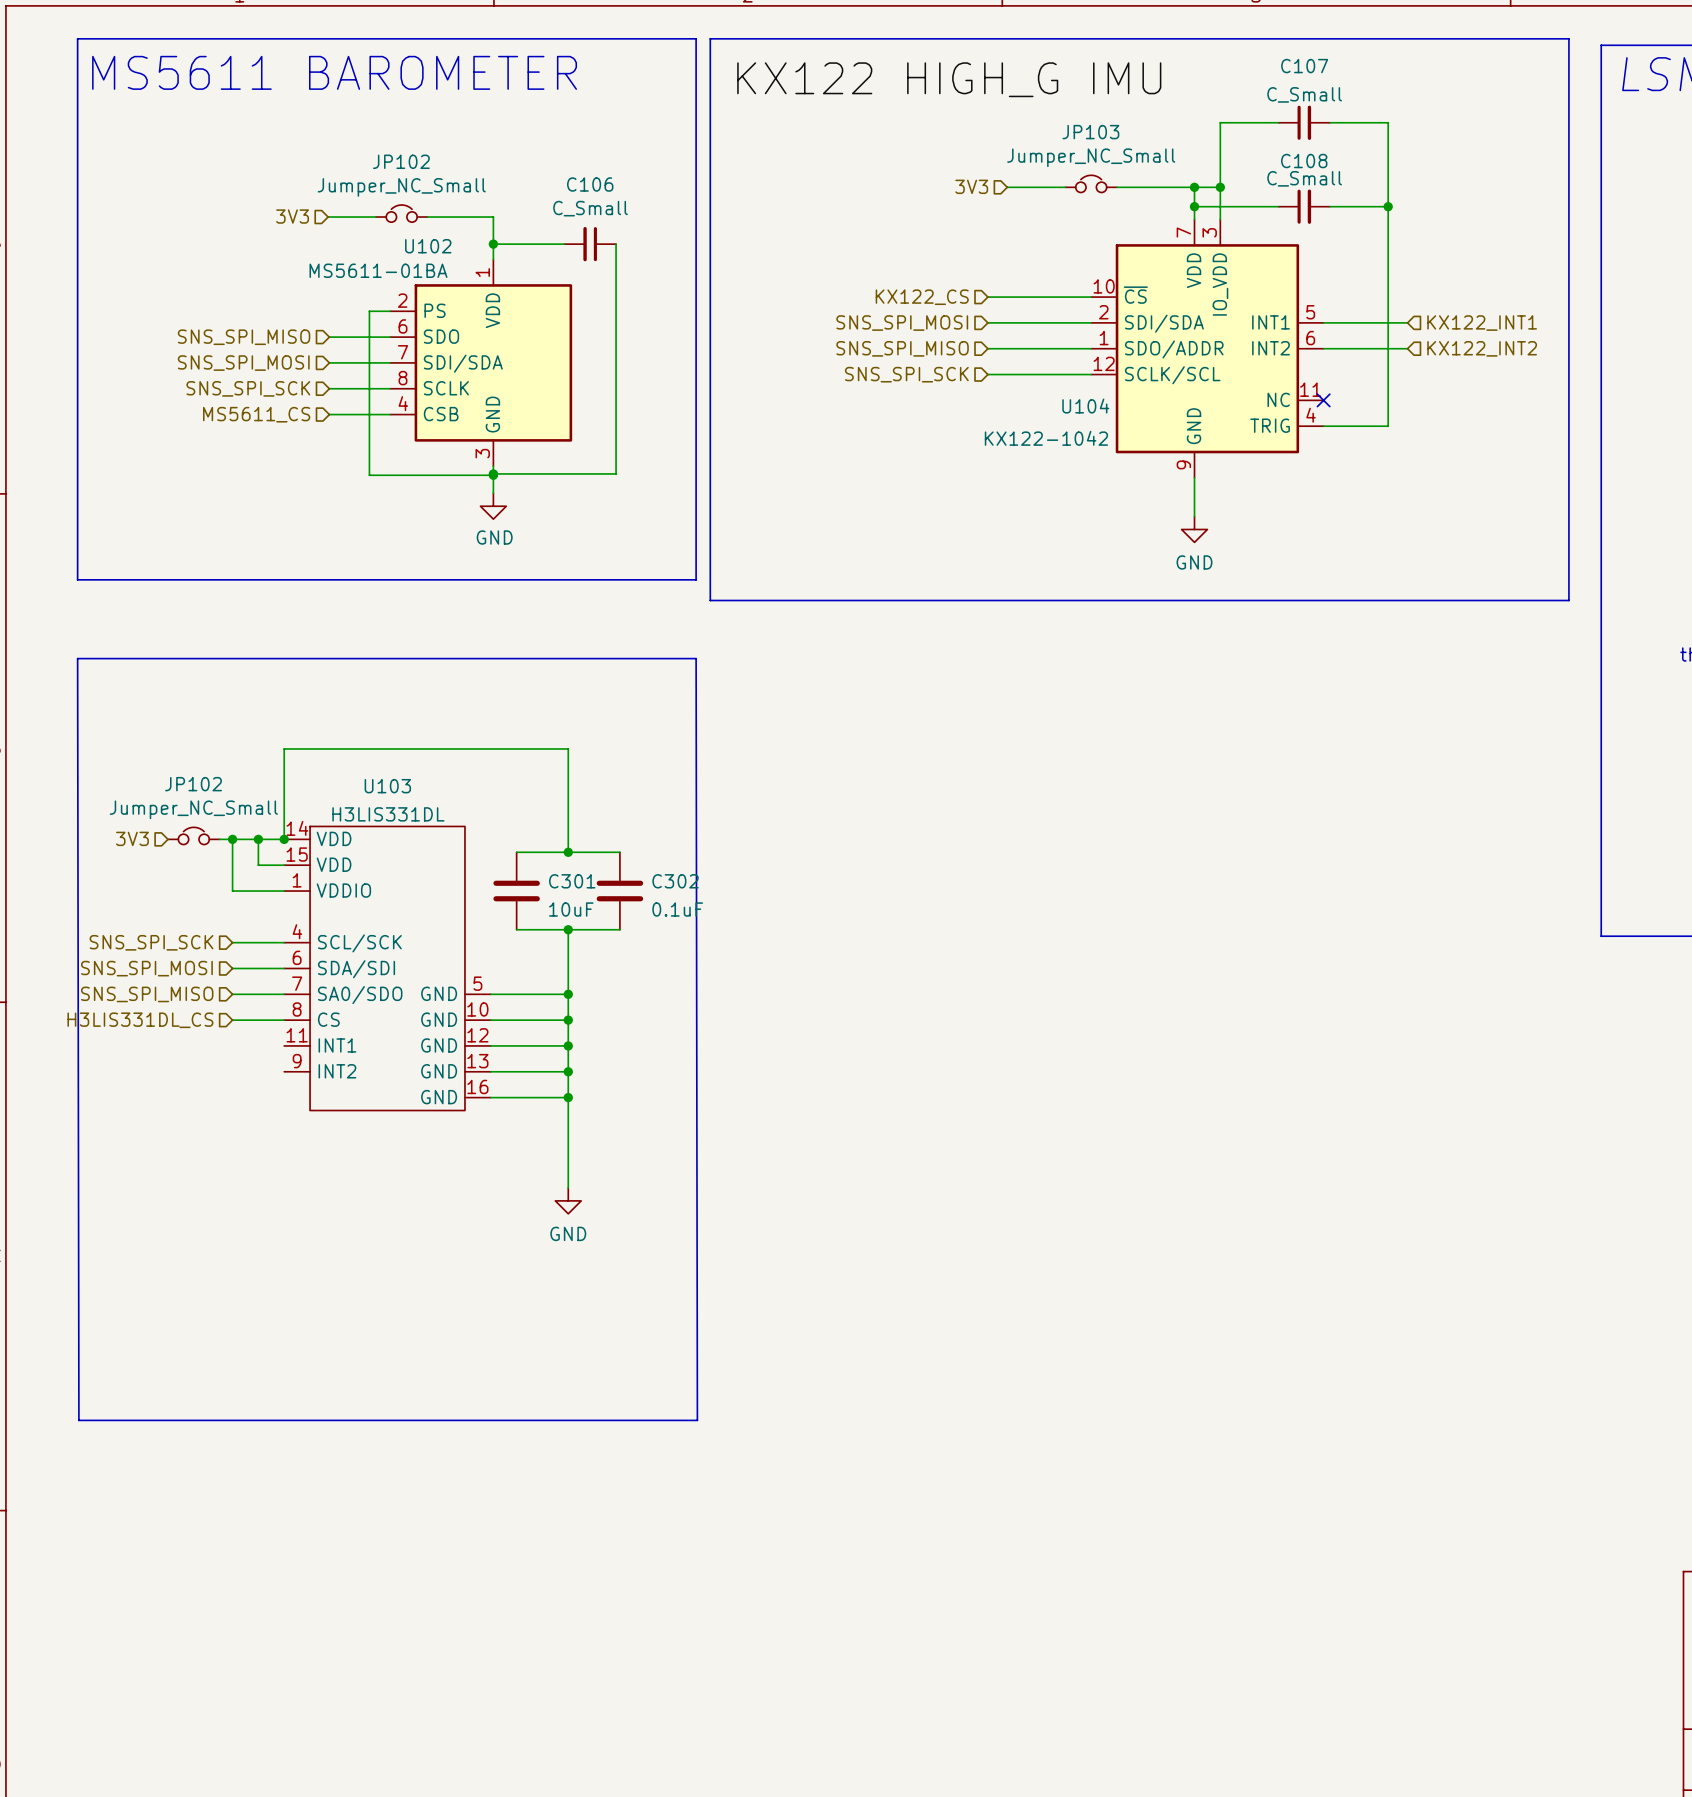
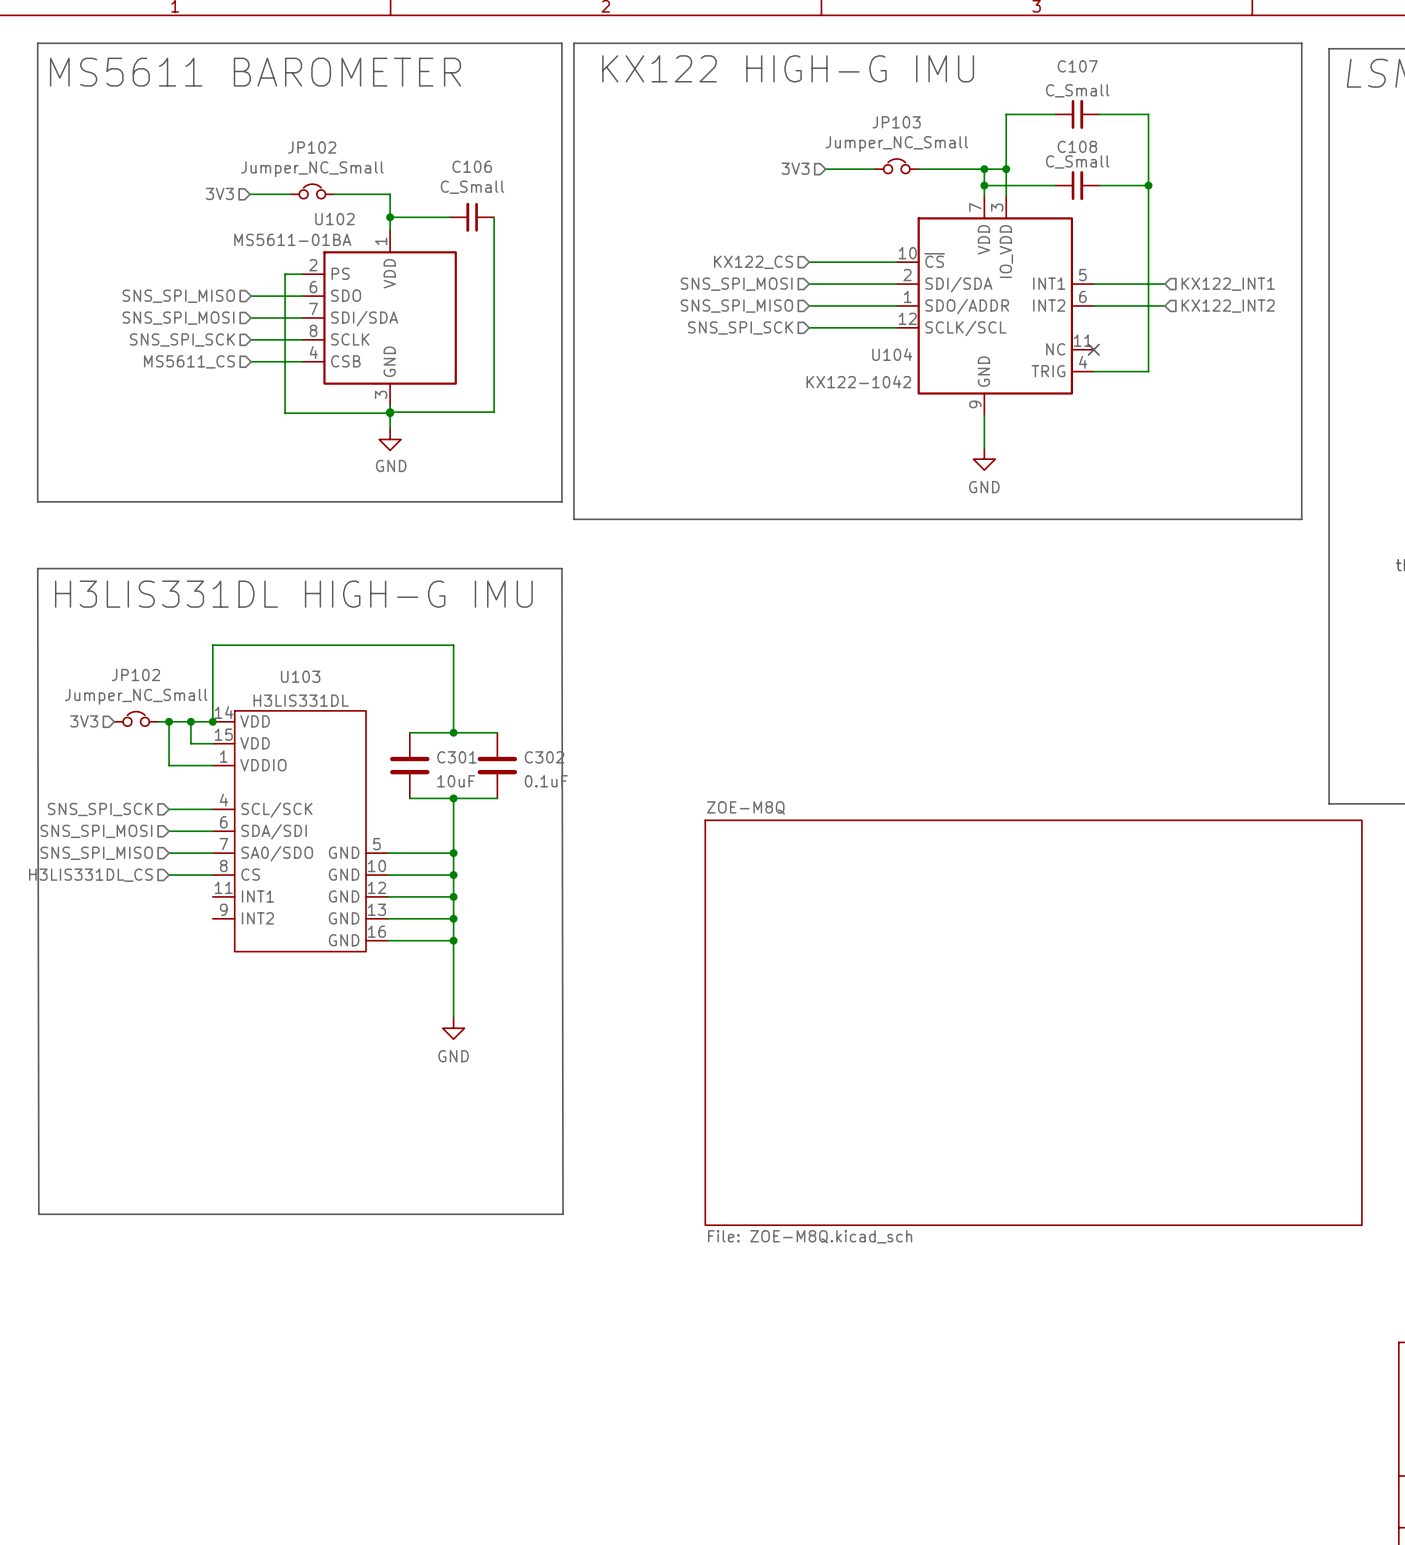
text: none -> KX122 HIGH-G IMU (788, 68)
label: KX122 HIGH_G IMU (949, 79) -> none
text: none -> H3LIS331DL HIGH-G IMU (293, 594)
sheet ZOE-M8Q: none -> File: ZOE-M8Q.kicad_sch (1033, 1022)

